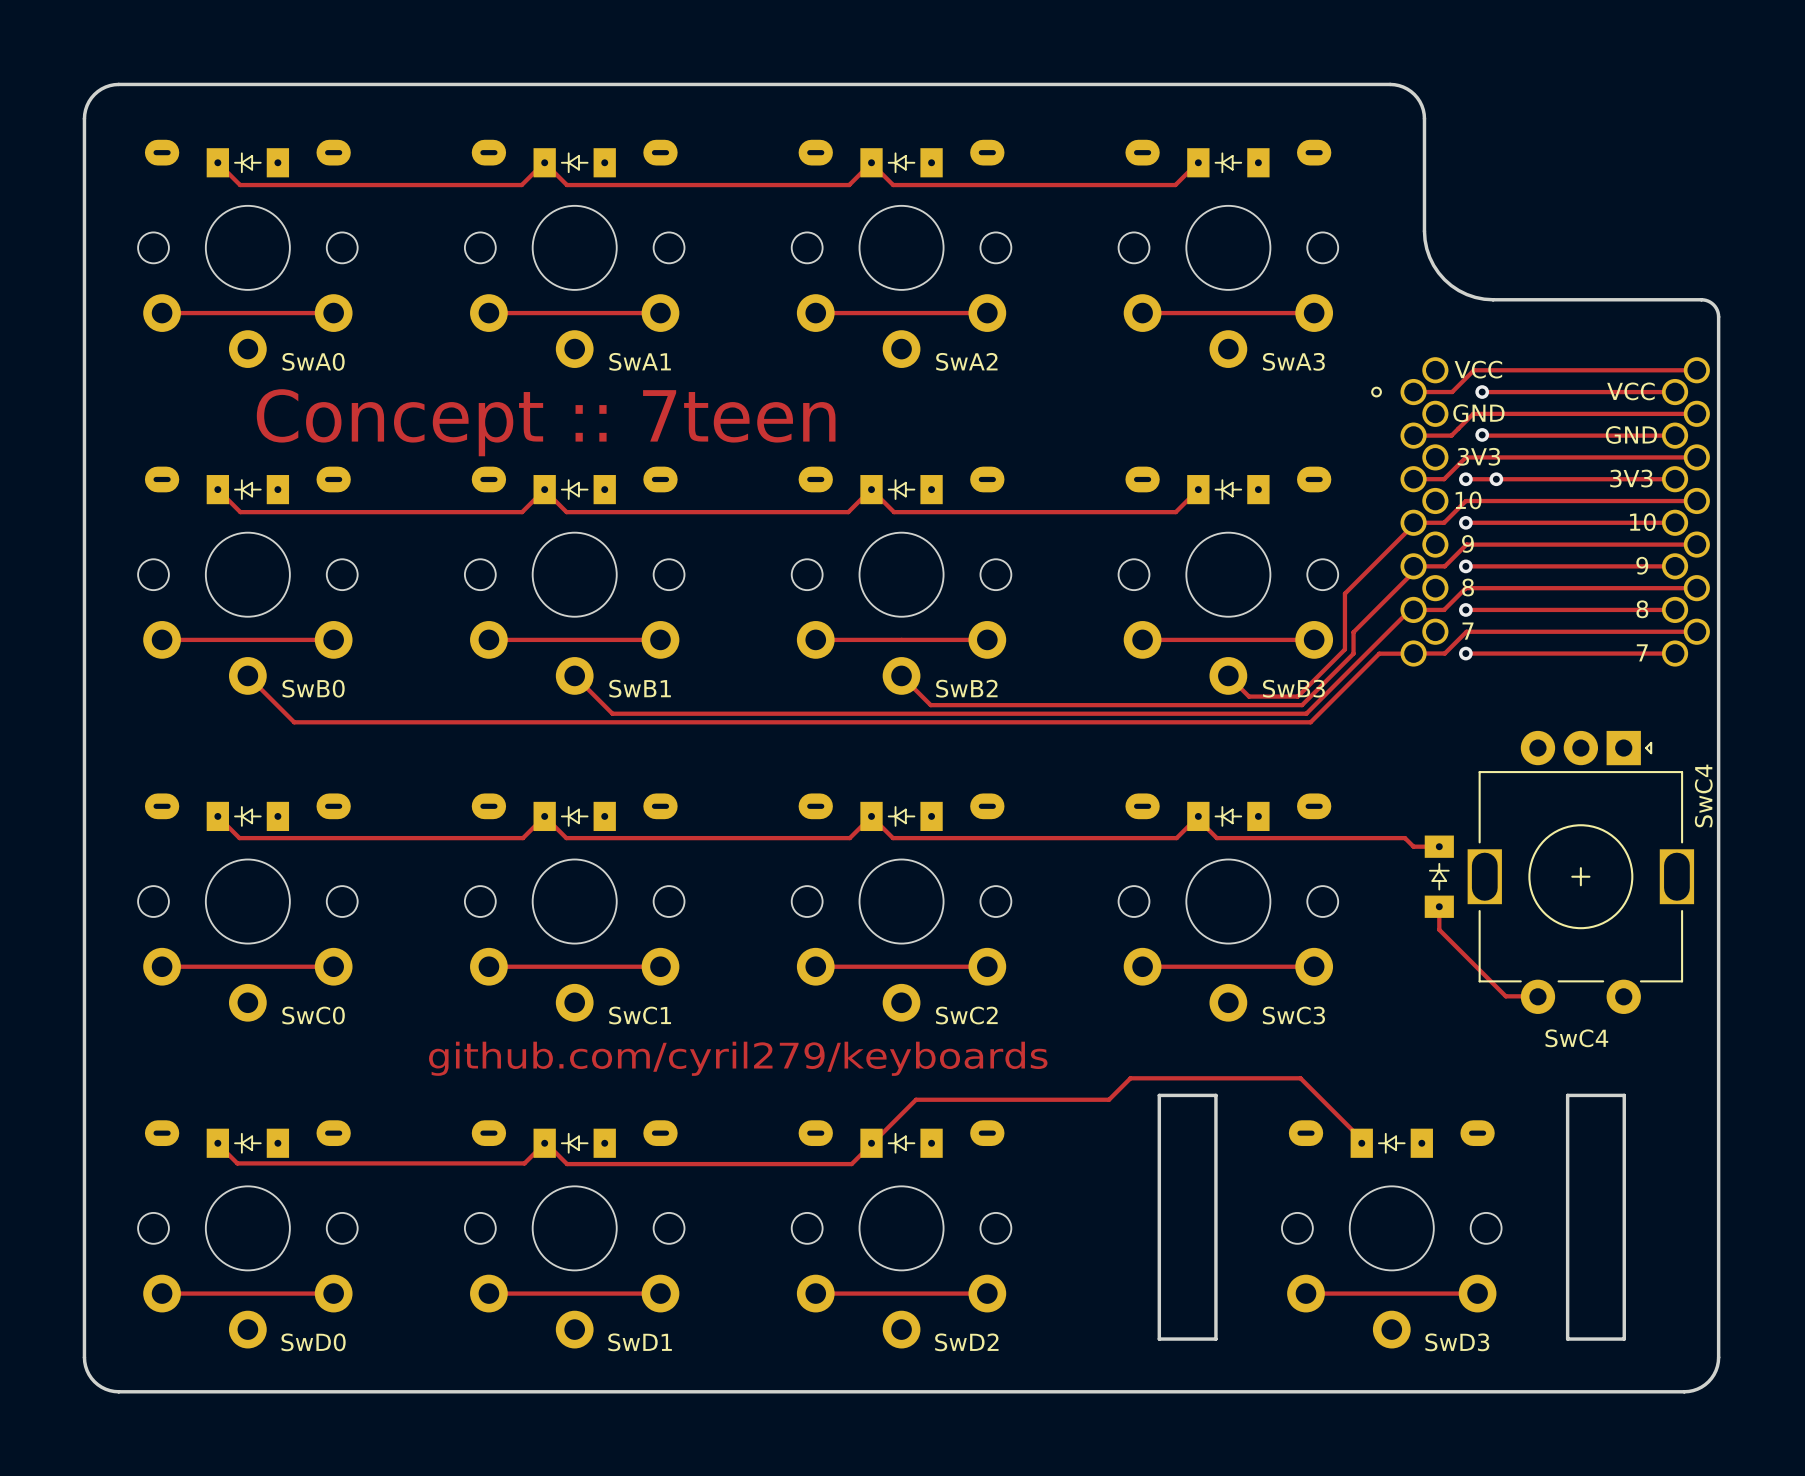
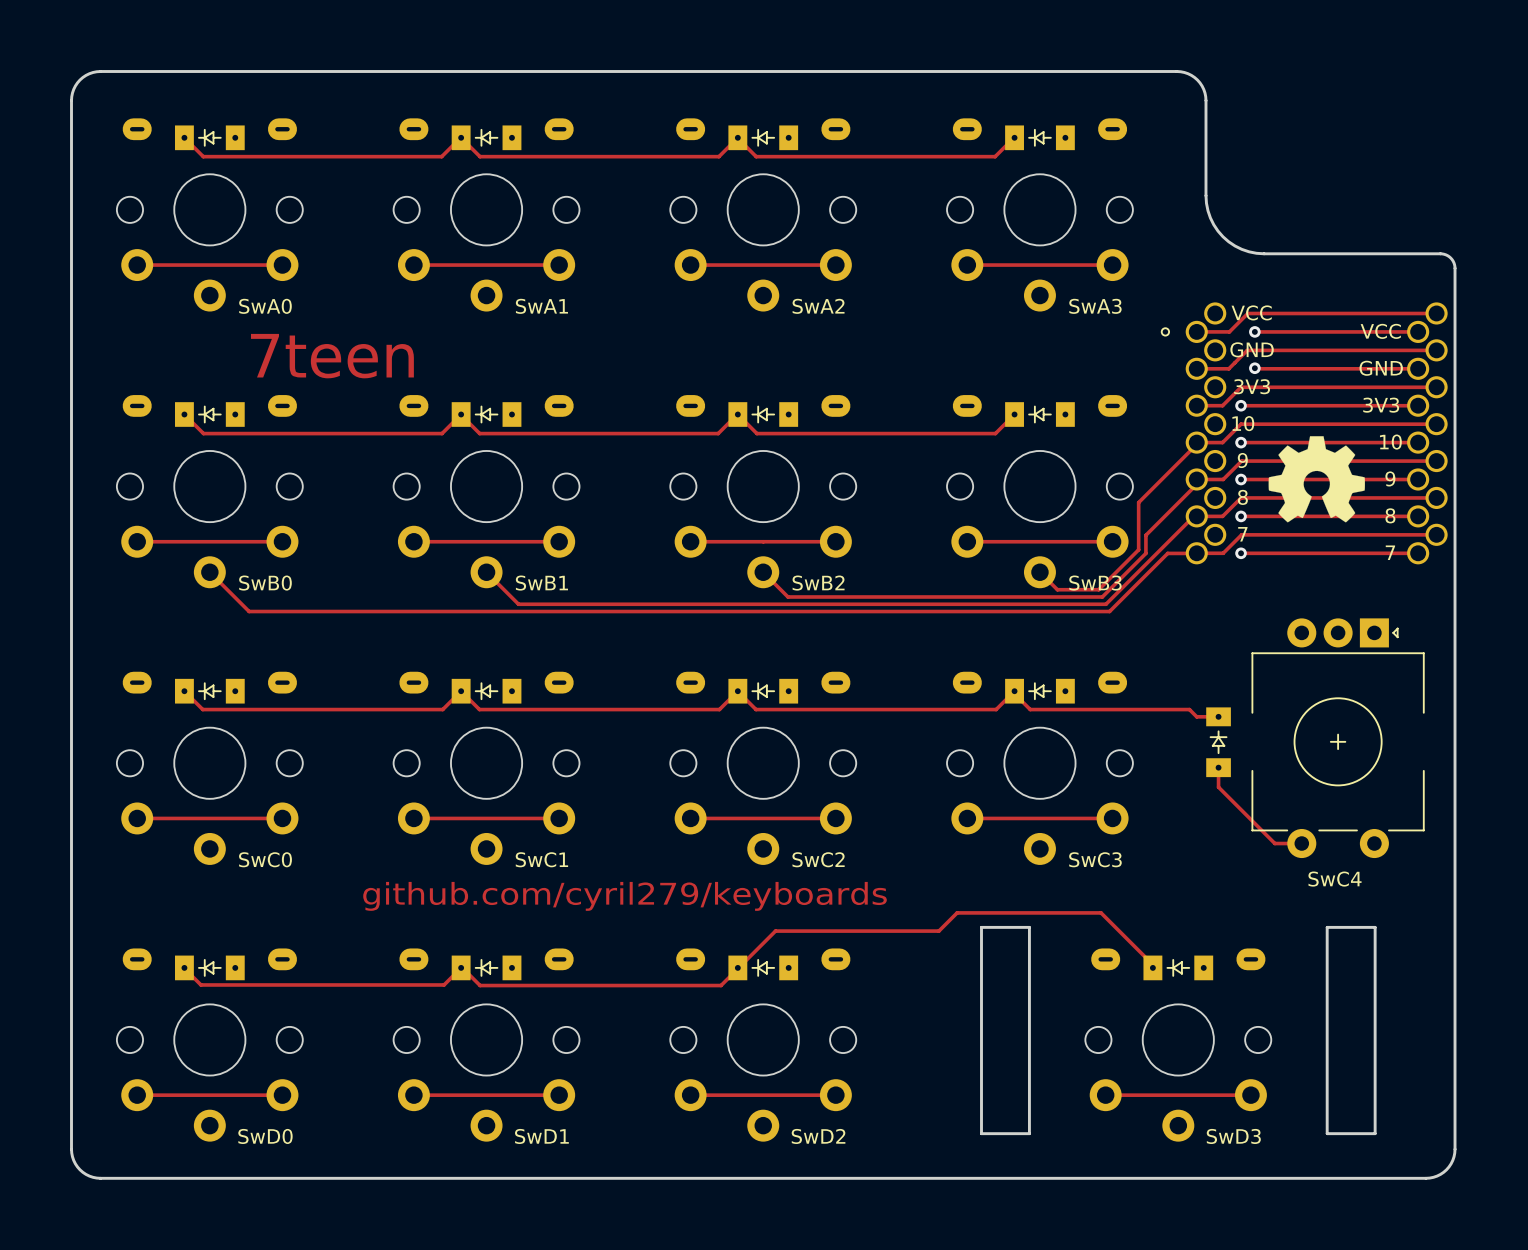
text: none -> 7teen (332, 356)
text: Concept :: 7teen (546, 422) -> none
via: (1496, 479) -> none
drawing: none -> [1268, 436, 1365, 523]
part: none -> (1338, 738)
SwC4: (1580, 872) -> none

